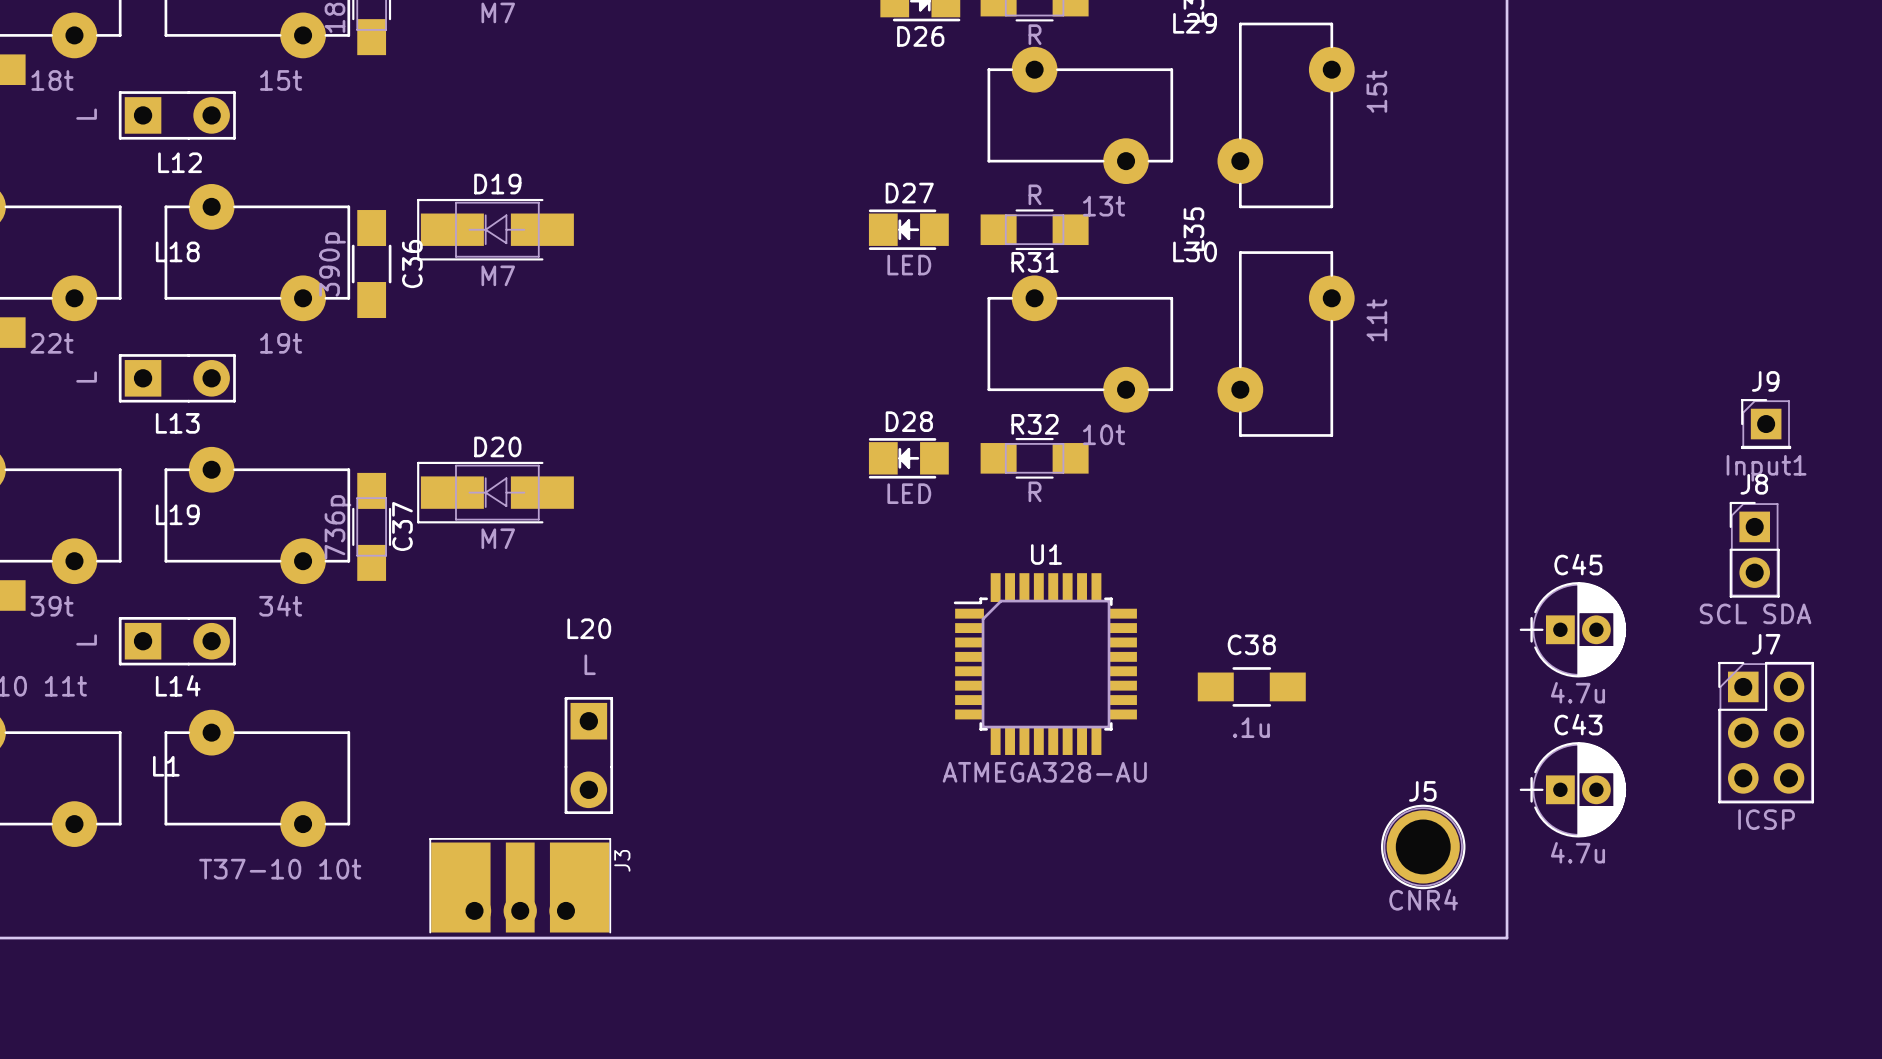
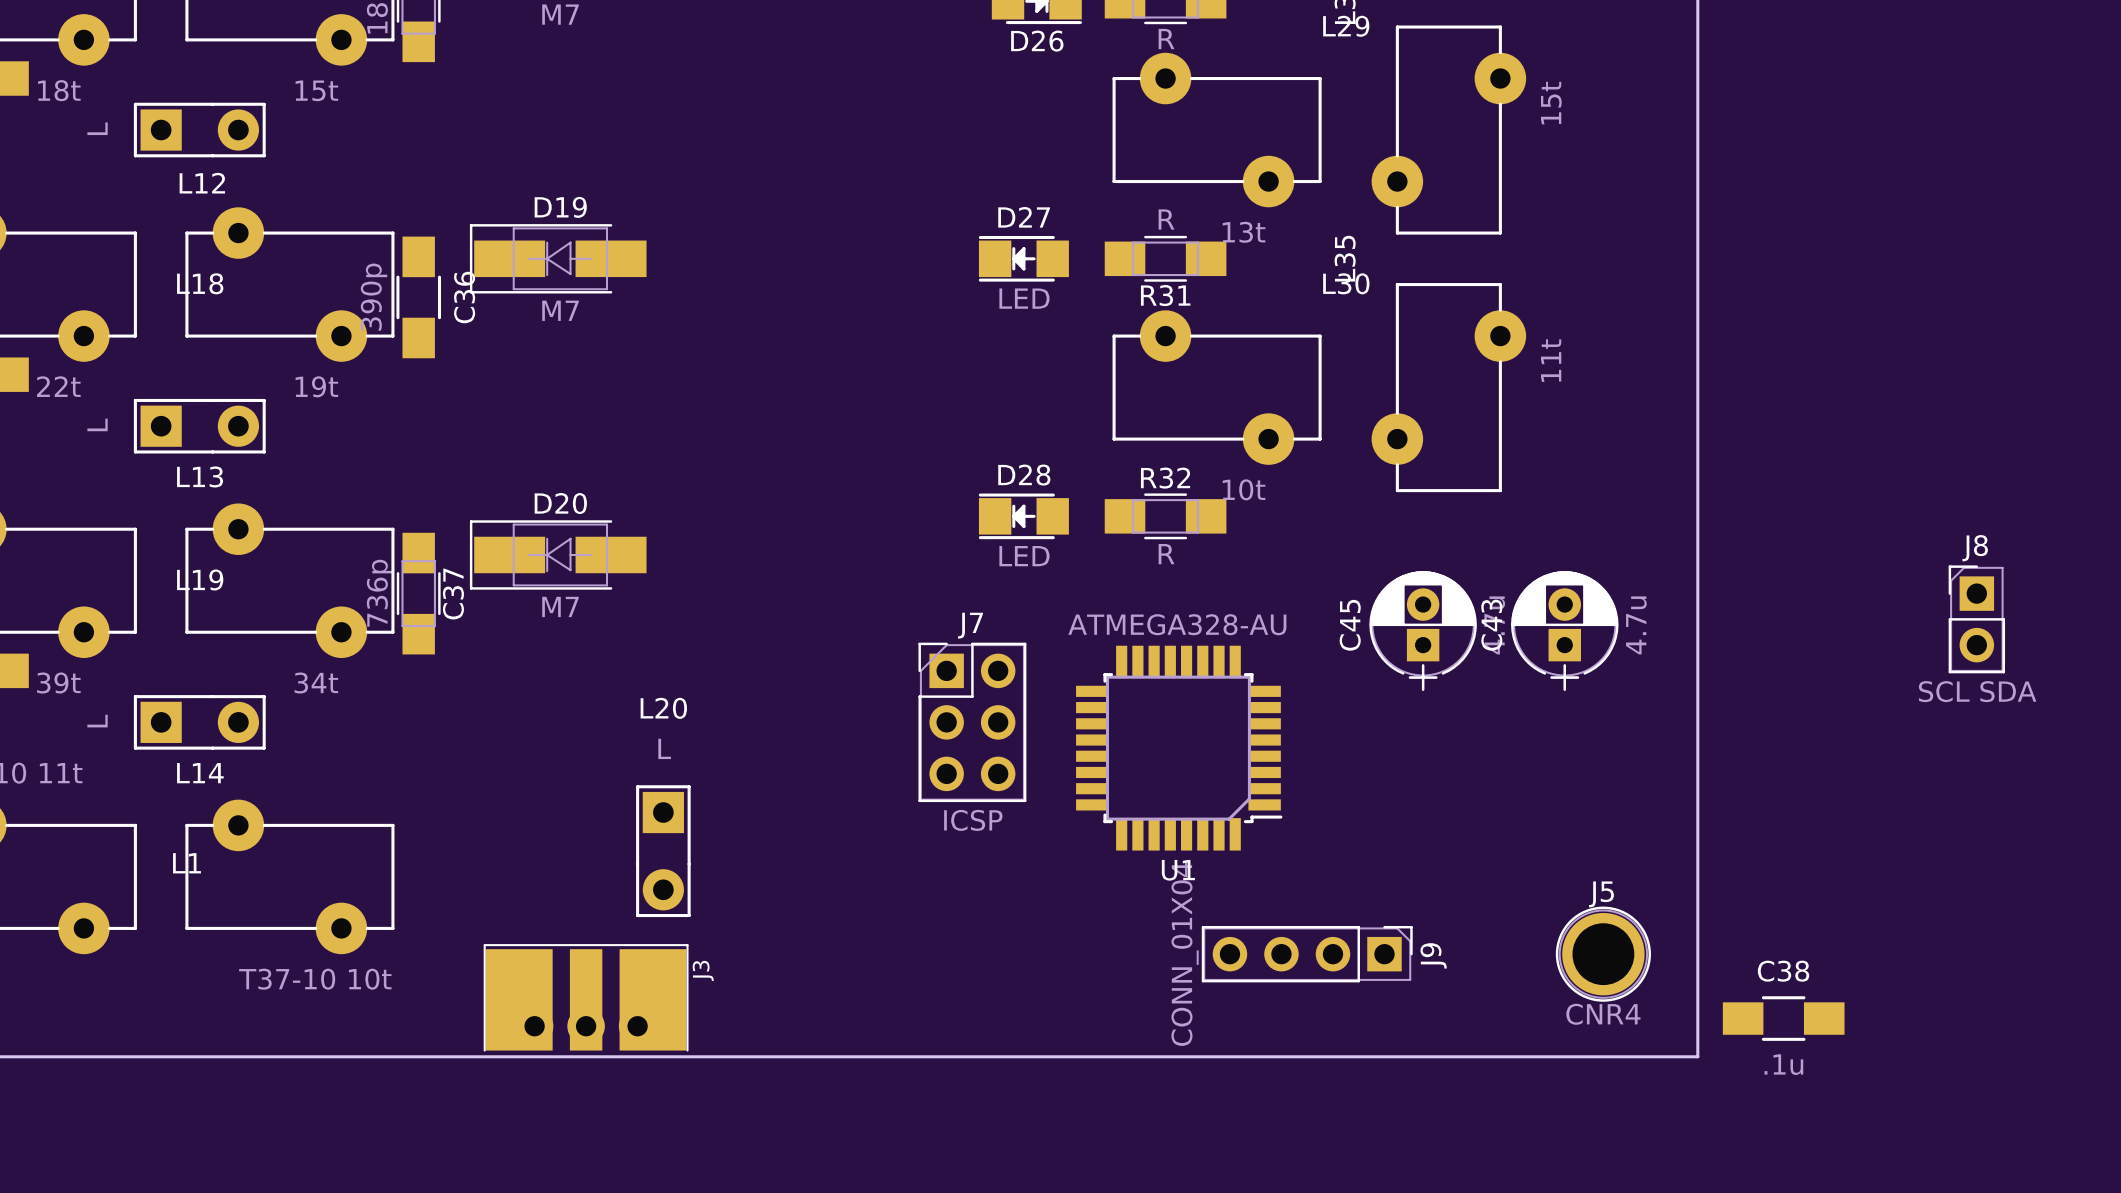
J9 name position: J9 (1765, 381) -> J9 (1433, 955)
J9 footprint: [1741, 399, 1792, 450] -> [1201, 925, 1413, 983]
J9 value: Input1 (1766, 468) -> CONN_01X04 (1185, 954)
C45 rotation: 0° (1572, 629) -> 90° counterclockwise (1423, 631)
C45 position: (1572, 629) -> (1423, 631)
U1 rotation: 0° (1045, 664) -> 180° (1179, 748)
C38 position: (1251, 686) -> (1783, 1018)
J7 position: (1766, 732) -> (972, 722)
C43 rotation: 0° (1572, 789) -> 90° counterclockwise (1564, 631)
C43 position: (1572, 789) -> (1564, 631)

